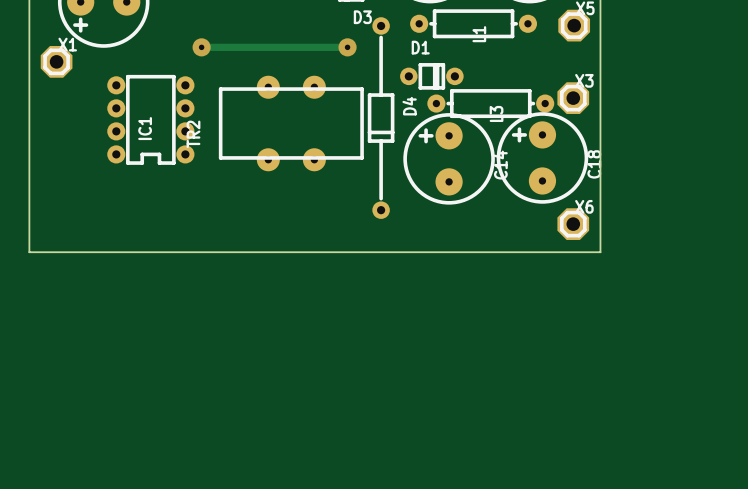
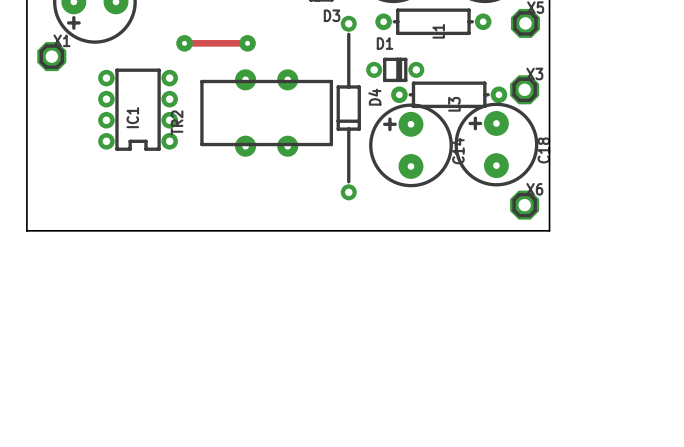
track: (270, 47) (347, 47) -> none
via: none -> (247, 43)
via: (347, 47) -> none

